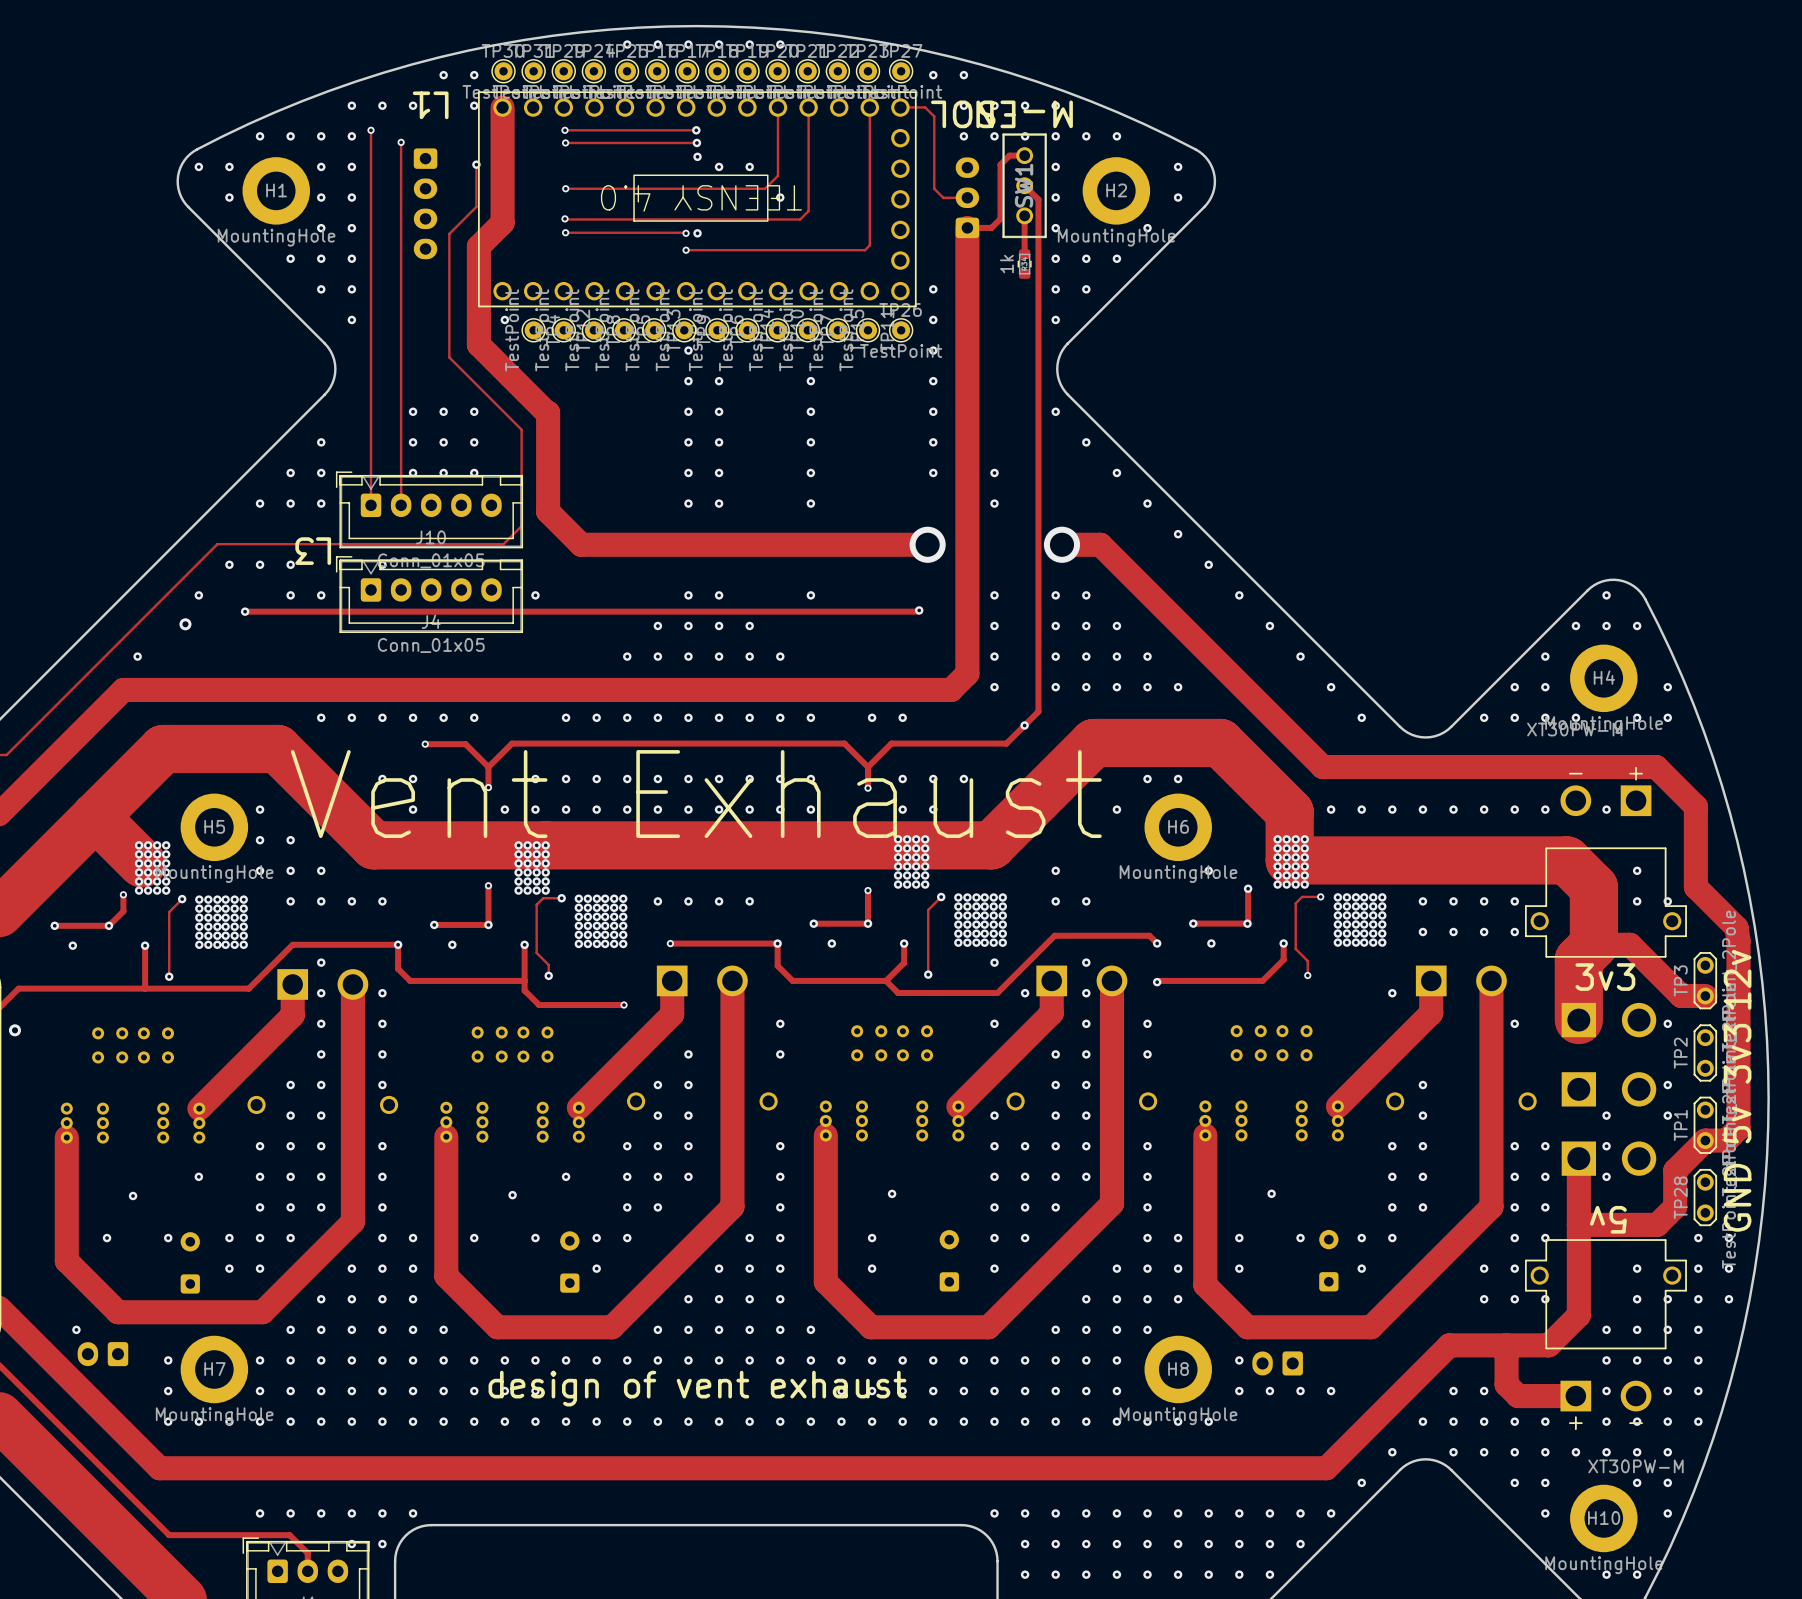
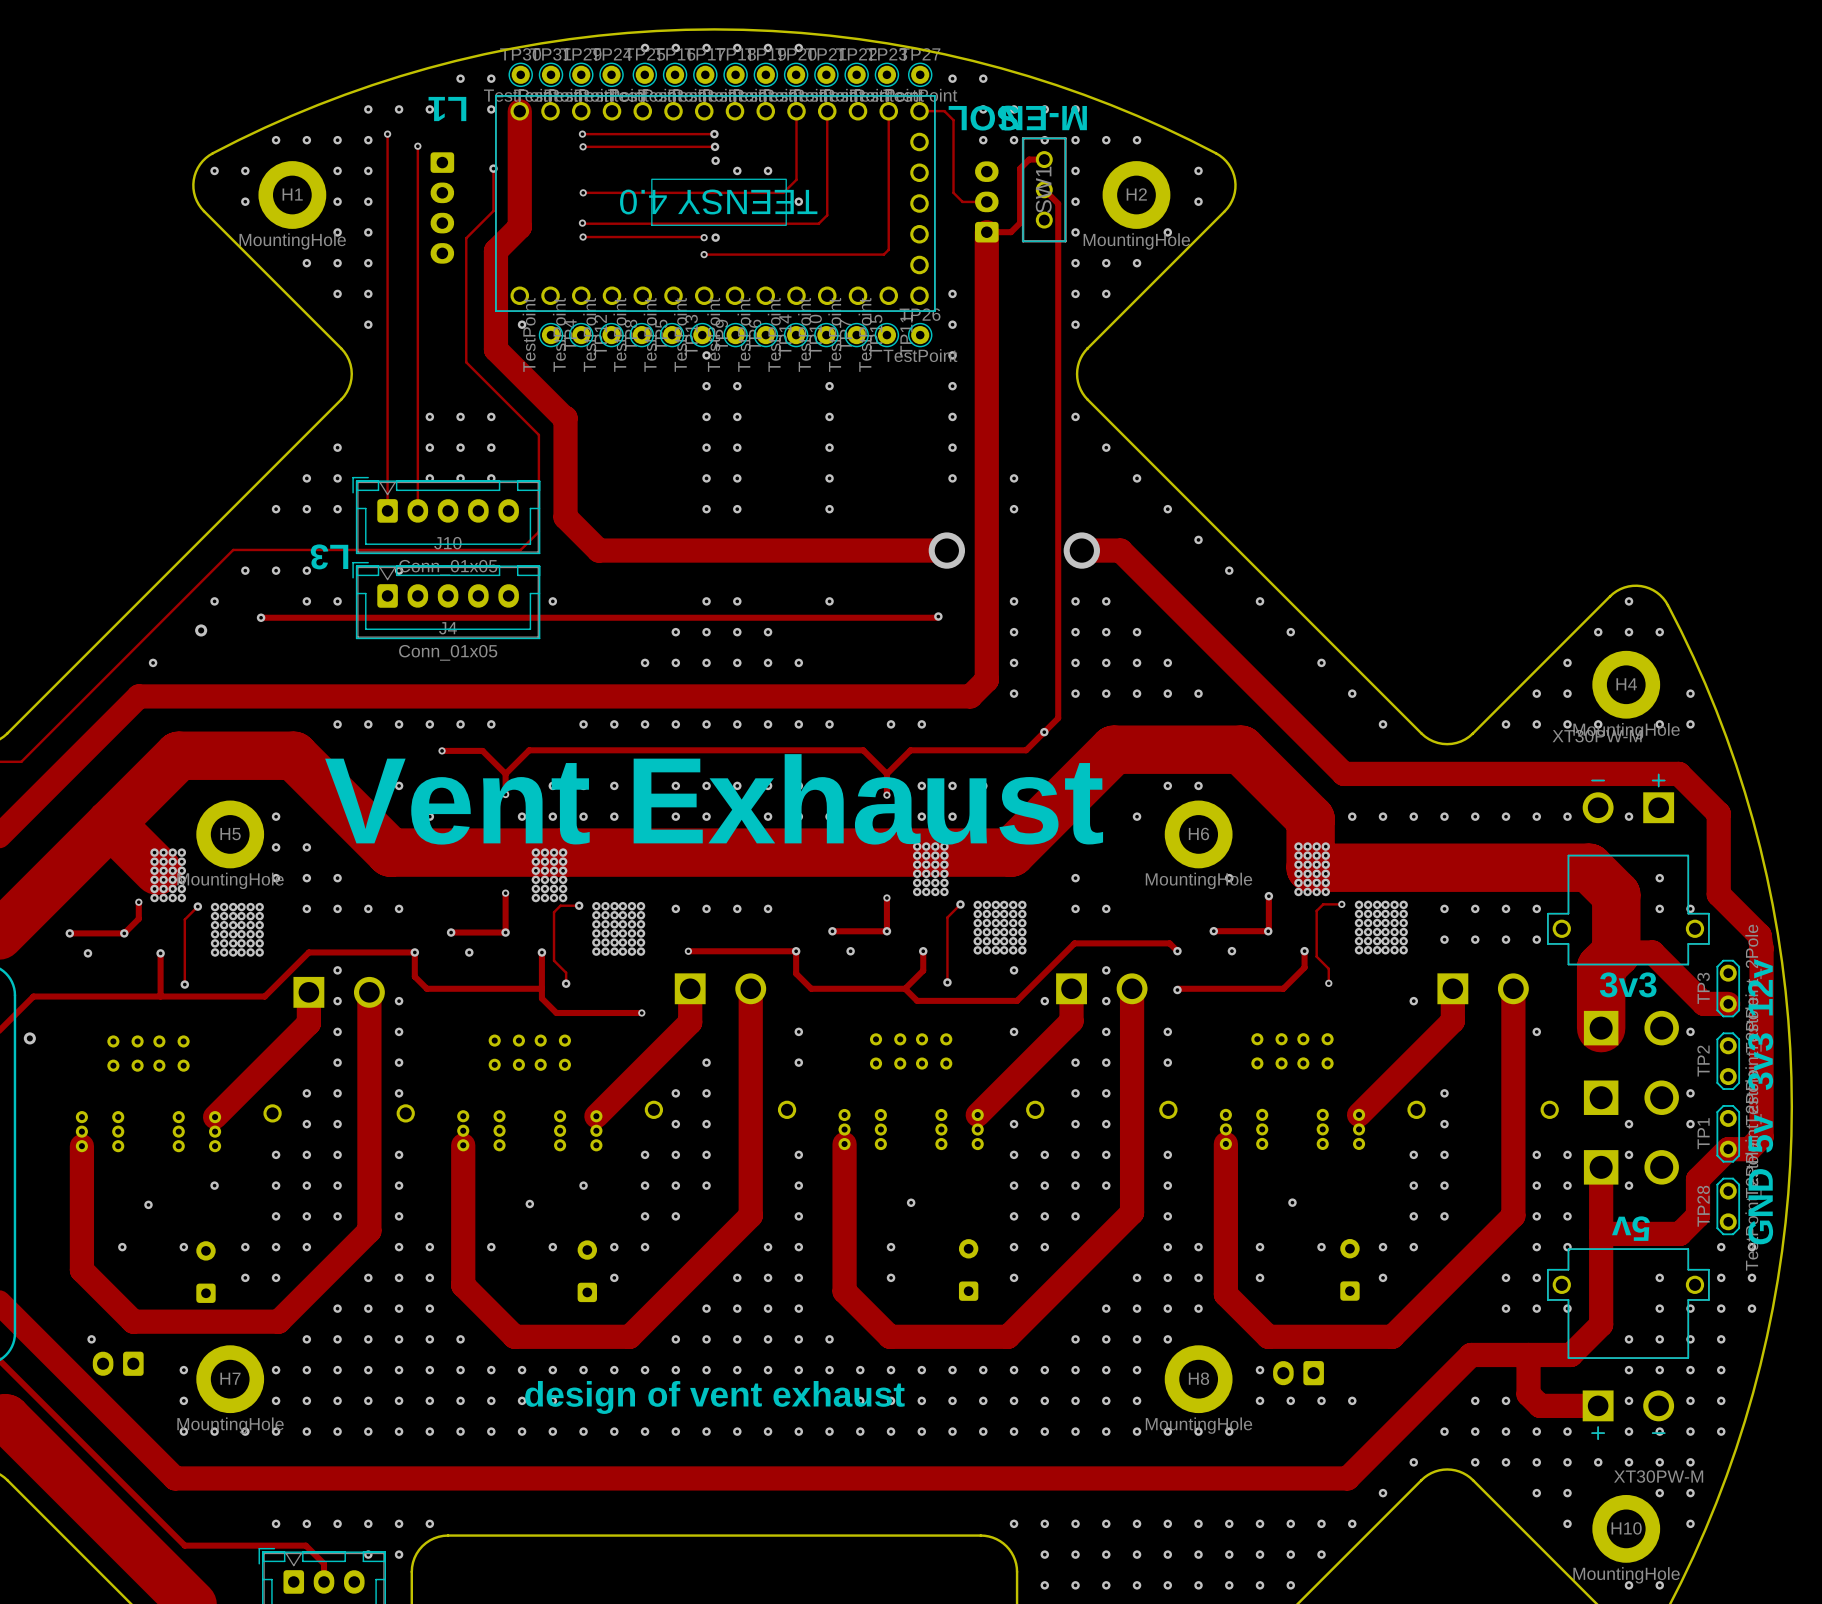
track: (1024, 215) (1024, 254) -> none
part: 1k (1024, 264) -> none

